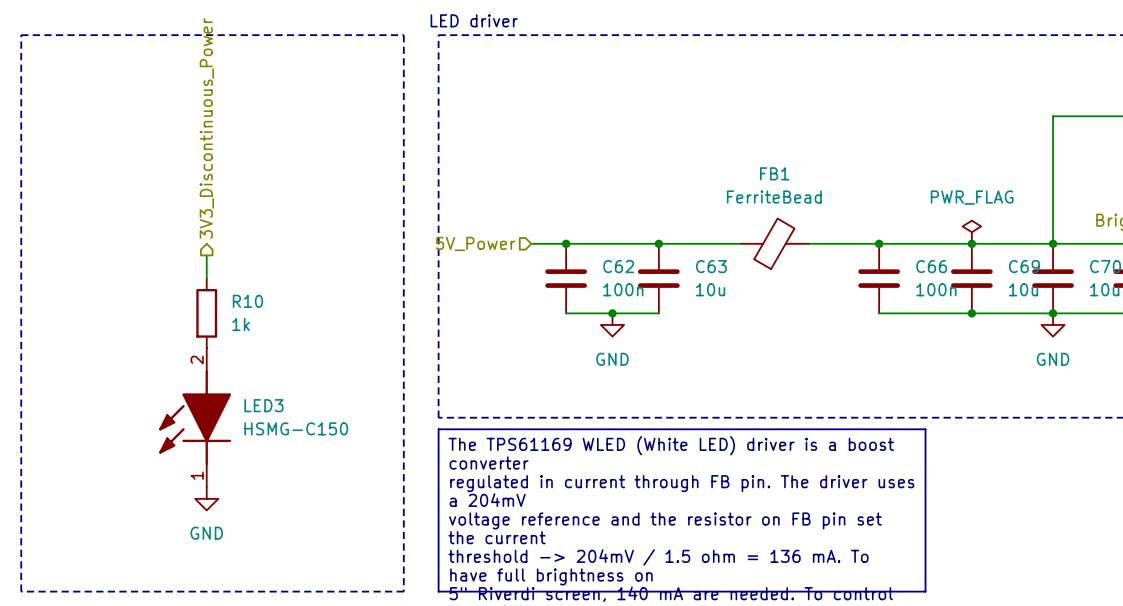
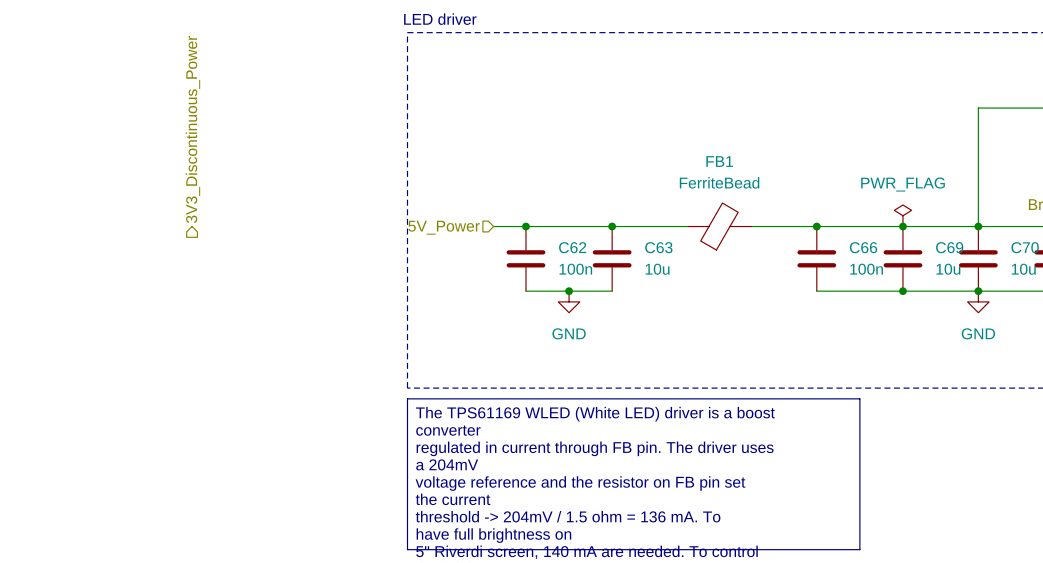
line: (21, 35) (21, 591) (403, 591) (403, 35) (21, 35) -> none
wire: (206, 255) (206, 278) -> none
R10: 1k (206, 313) -> none
LED3: HSMG-C150 (195, 417) -> none
power symbol: GND (206, 498) -> none

